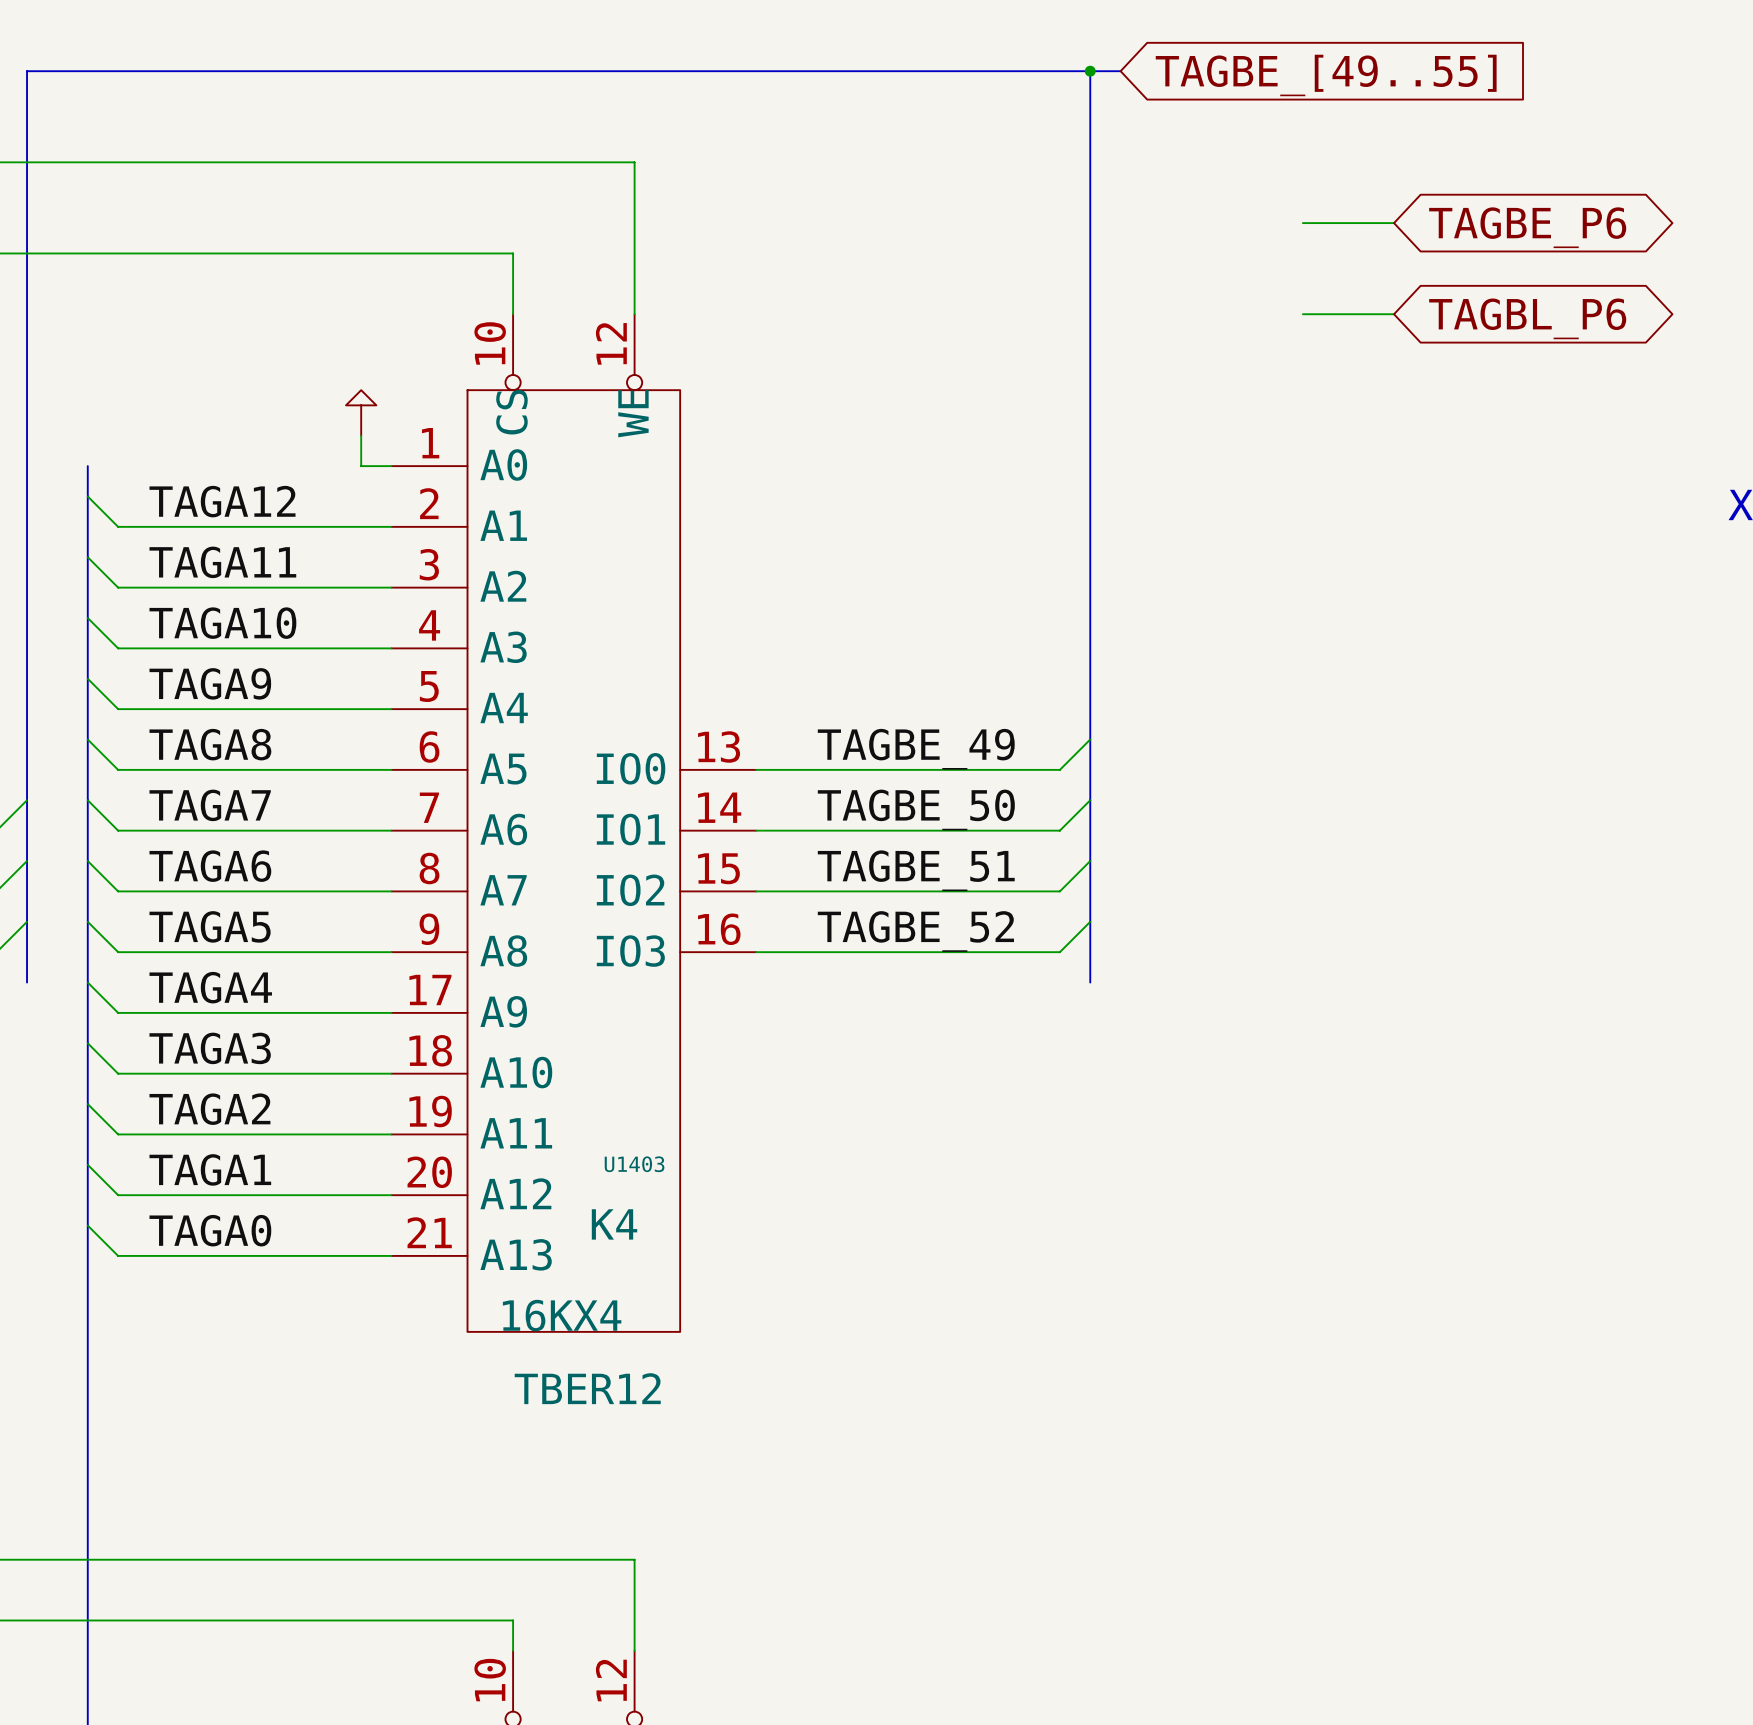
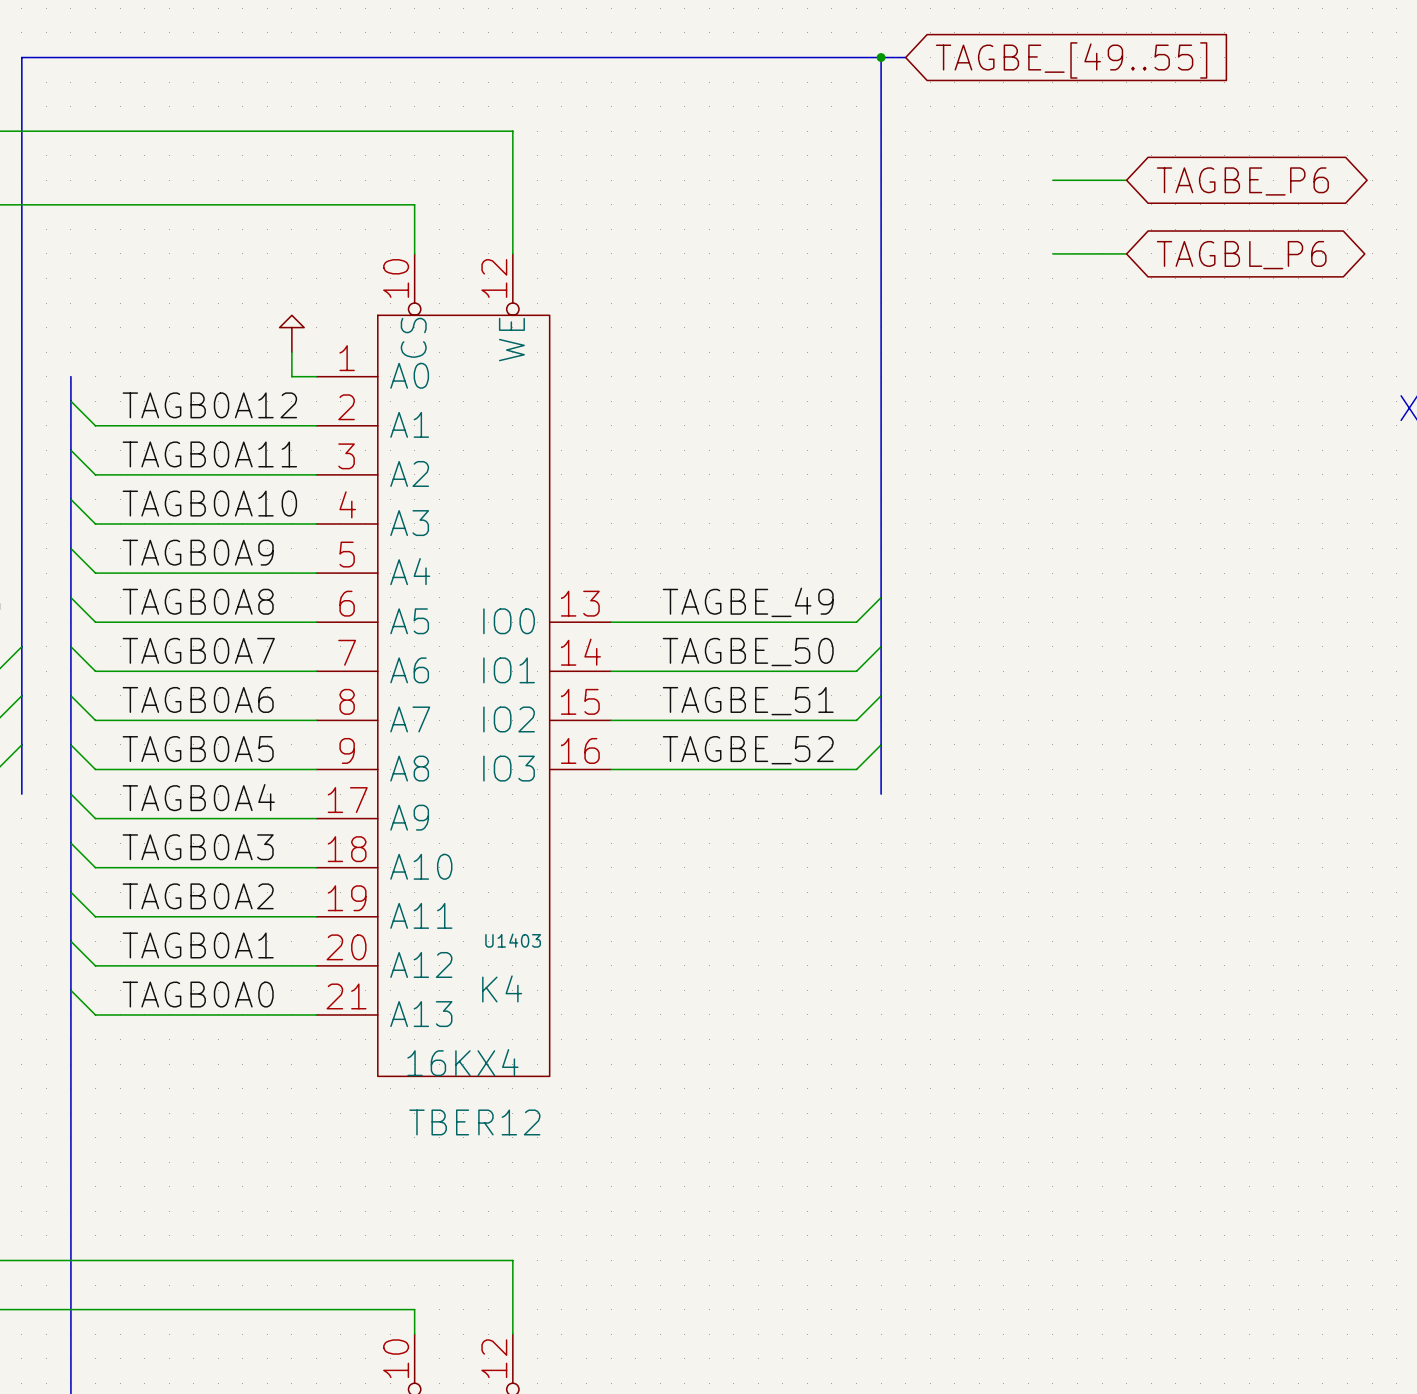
label: TAGA12 (222, 501) -> TAGB0A12 (209, 405)
label: TAGA11 (222, 562) -> TAGB0A11 (209, 454)
label: TAGA10 (222, 623) -> TAGB0A10 (209, 503)
label: TAGA9 (210, 683) -> TAGB0A9 (198, 552)
label: TAGA8 (210, 744) -> TAGB0A8 (198, 601)
label: TAGA7 (210, 805) -> TAGB0A7 (198, 650)
label: TAGA6 (210, 866) -> TAGB0A6 (198, 699)
label: TAGA5 (210, 926) -> TAGB0A5 (198, 749)
label: TAGA4 (210, 987) -> TAGB0A4 (198, 797)
label: TAGA3 (210, 1048) -> TAGB0A3 (198, 847)
label: TAGA2 (209, 1109) -> TAGB0A2 (198, 896)
label: TAGA1 (210, 1169) -> TAGB0A1 (198, 945)
label: TAGA0 (210, 1230) -> TAGB0A0 (198, 994)

